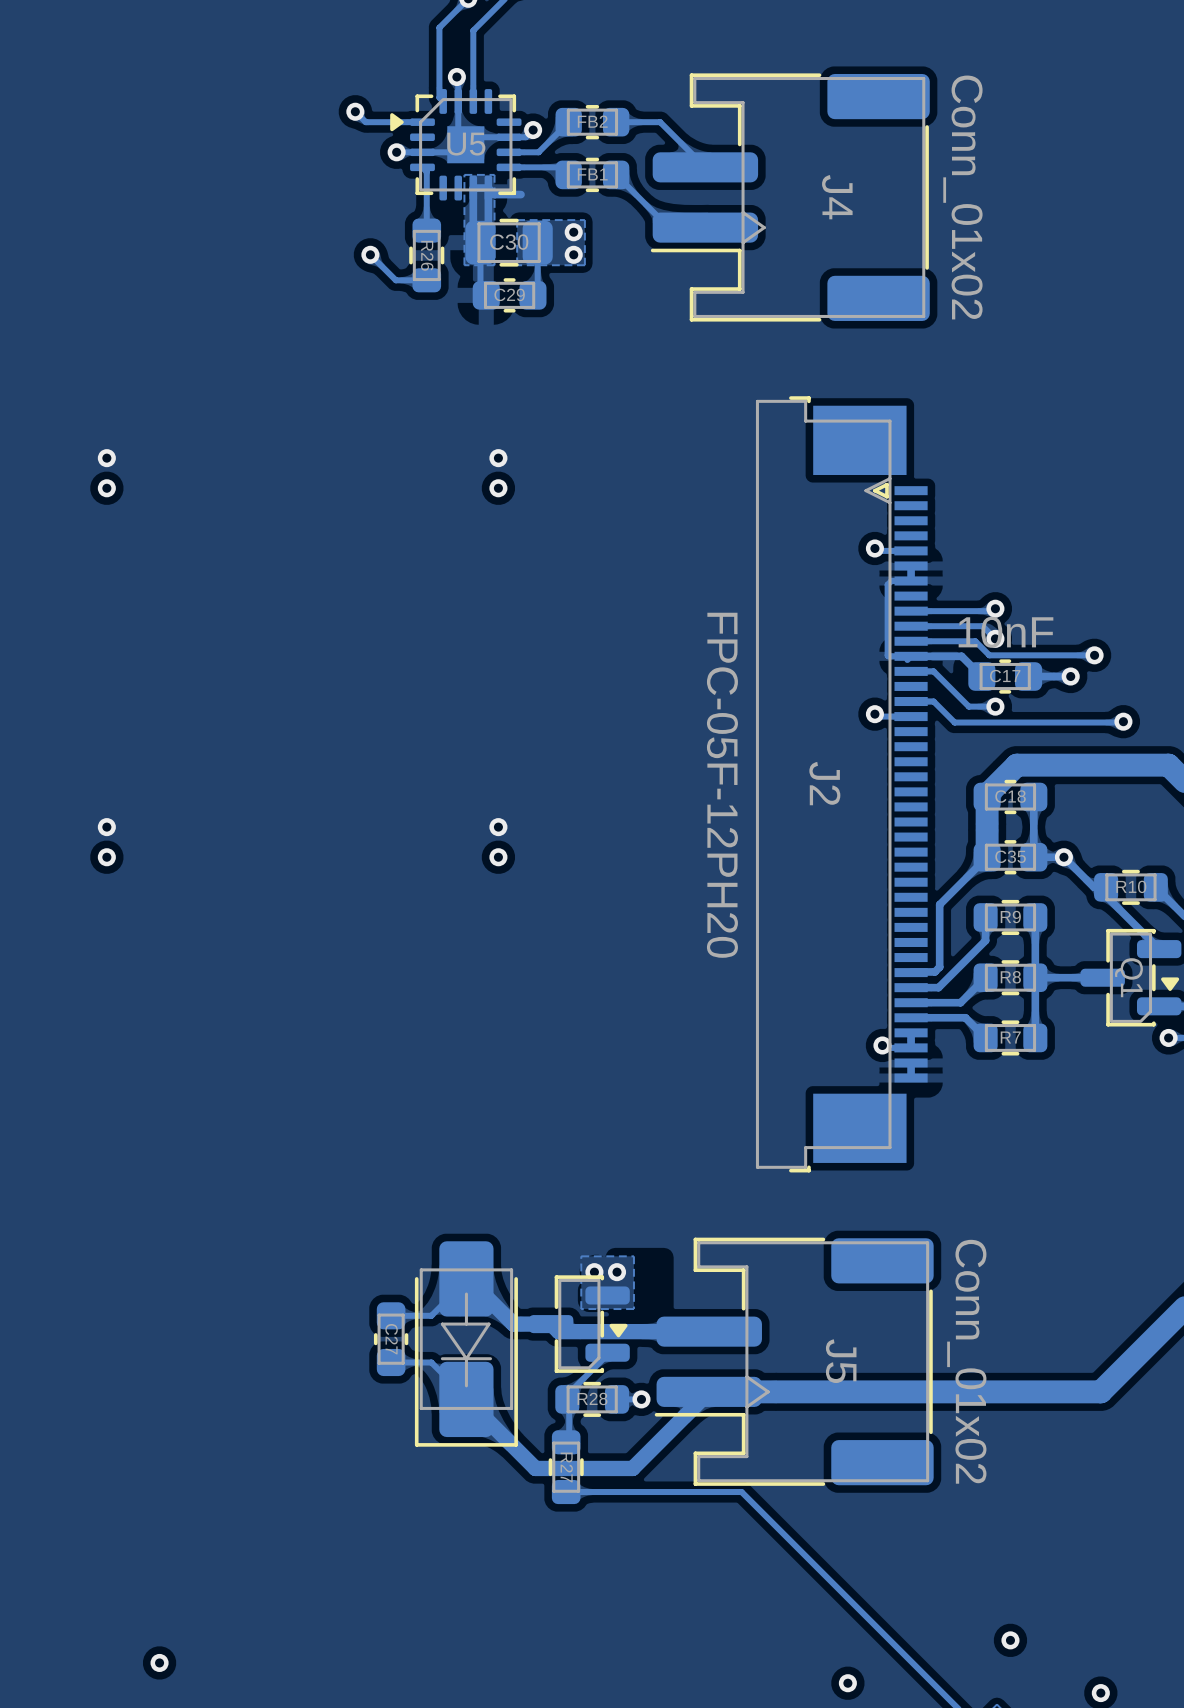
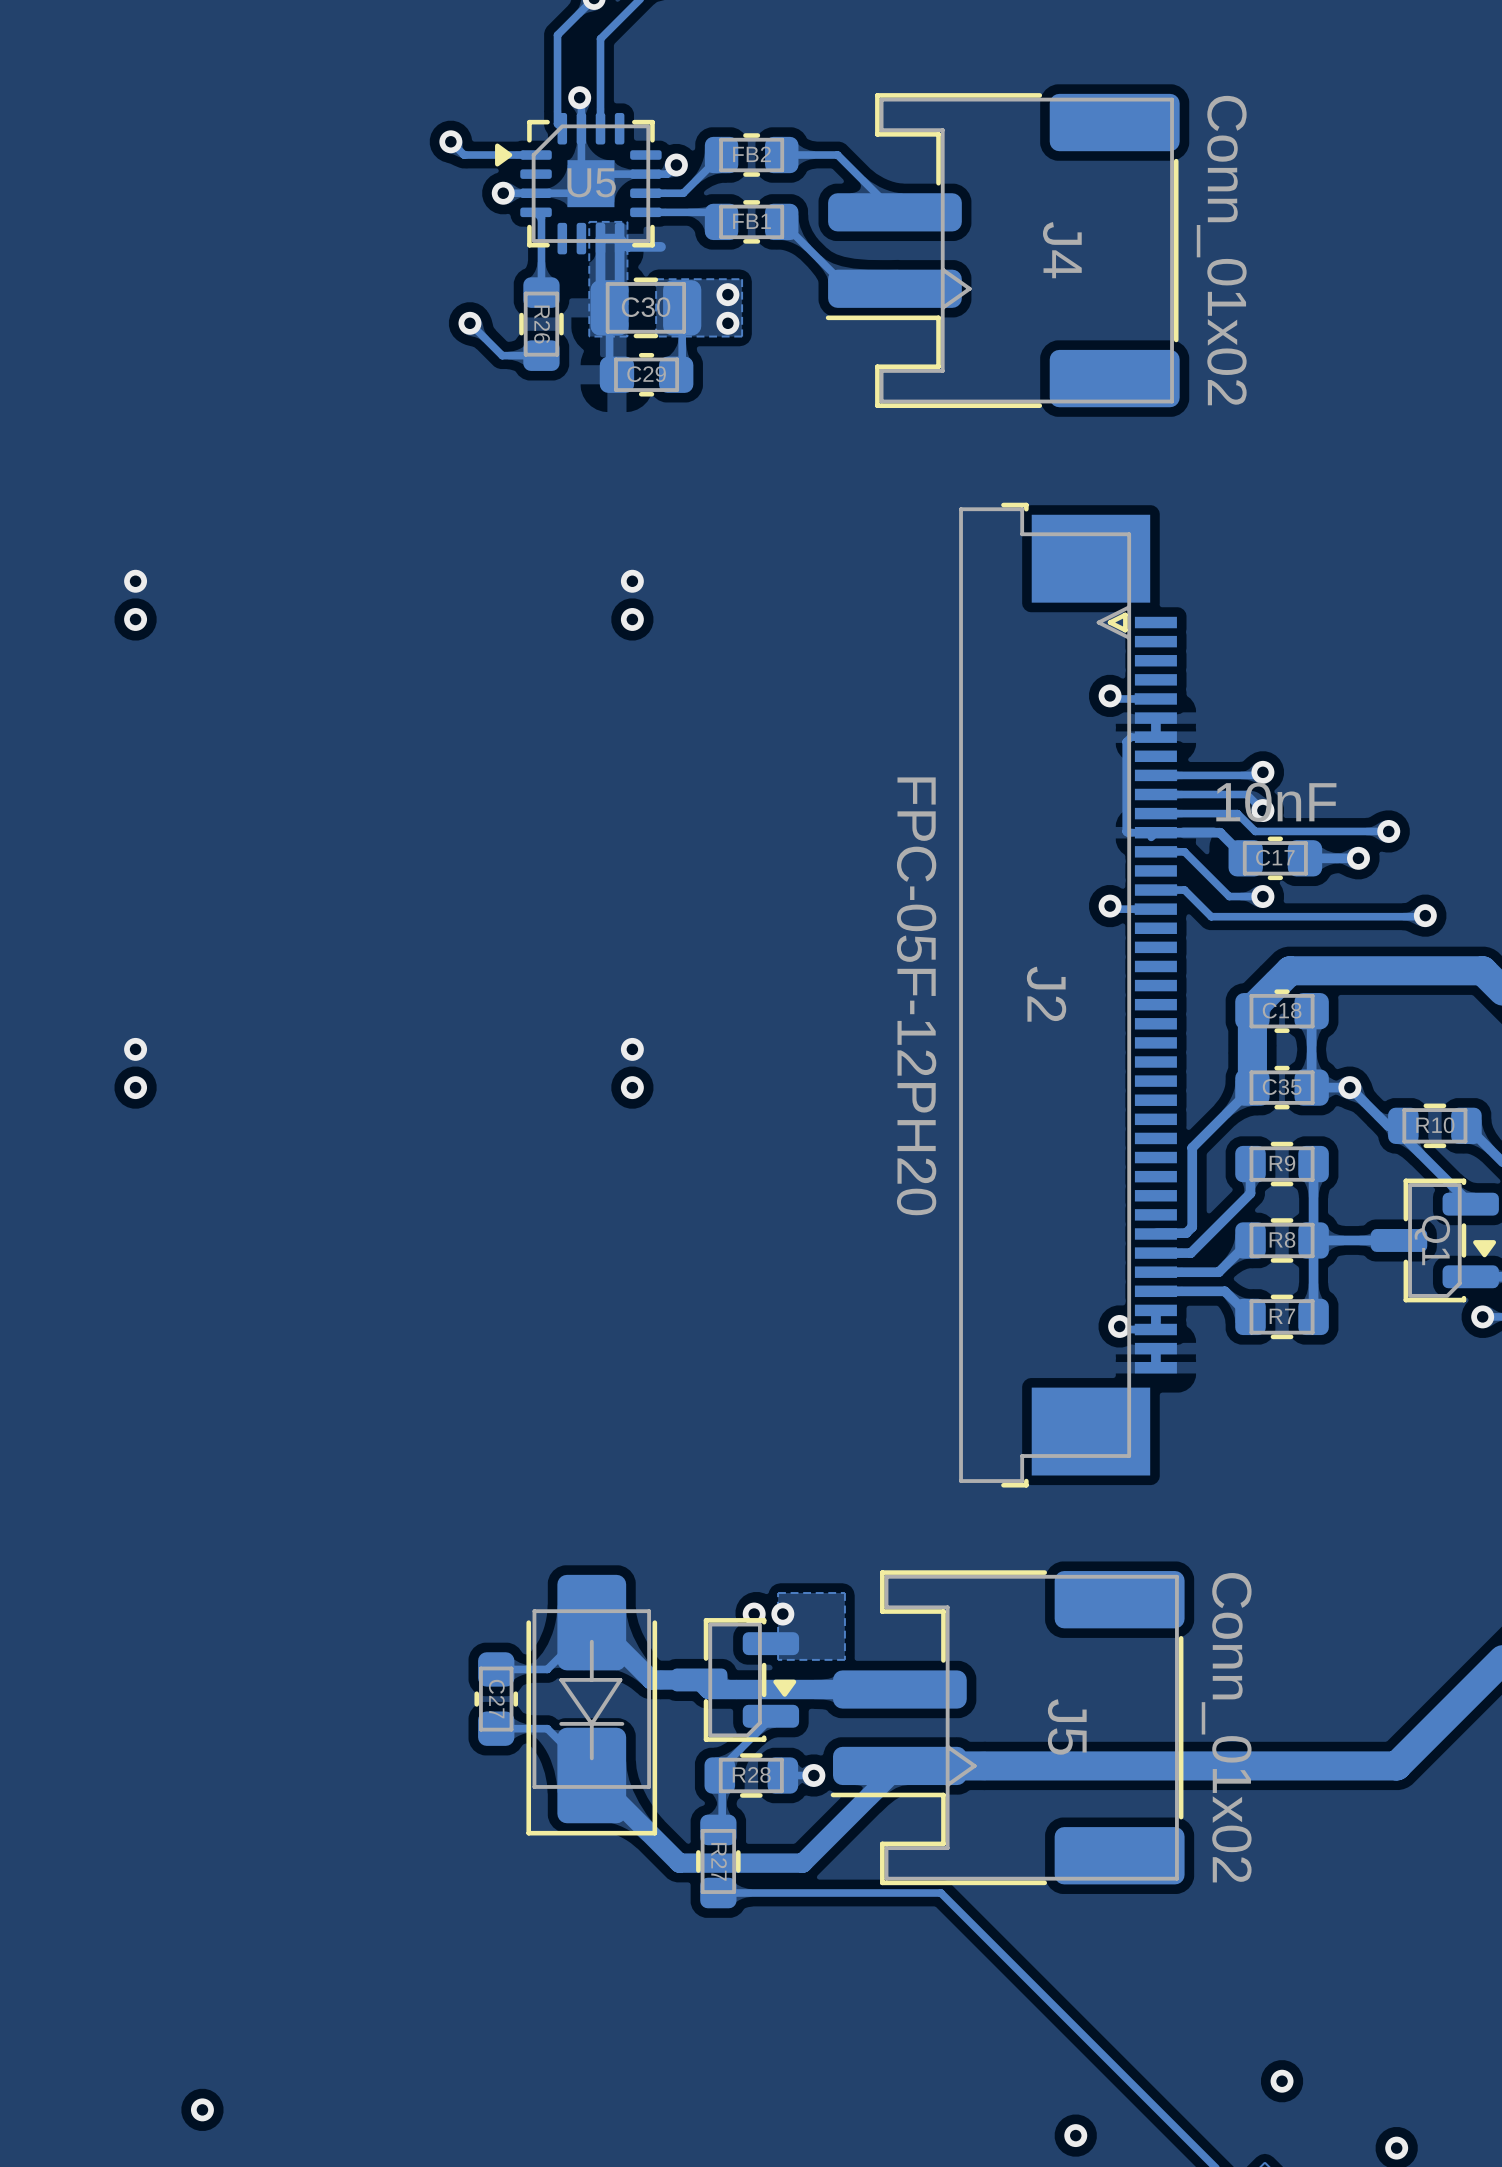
zone outline: (633, 1256) (581, 1256) (581, 1309) (633, 1309) (633, 1256) -> (844, 1593) (778, 1593) (778, 1659) (844, 1659) (844, 1593)

